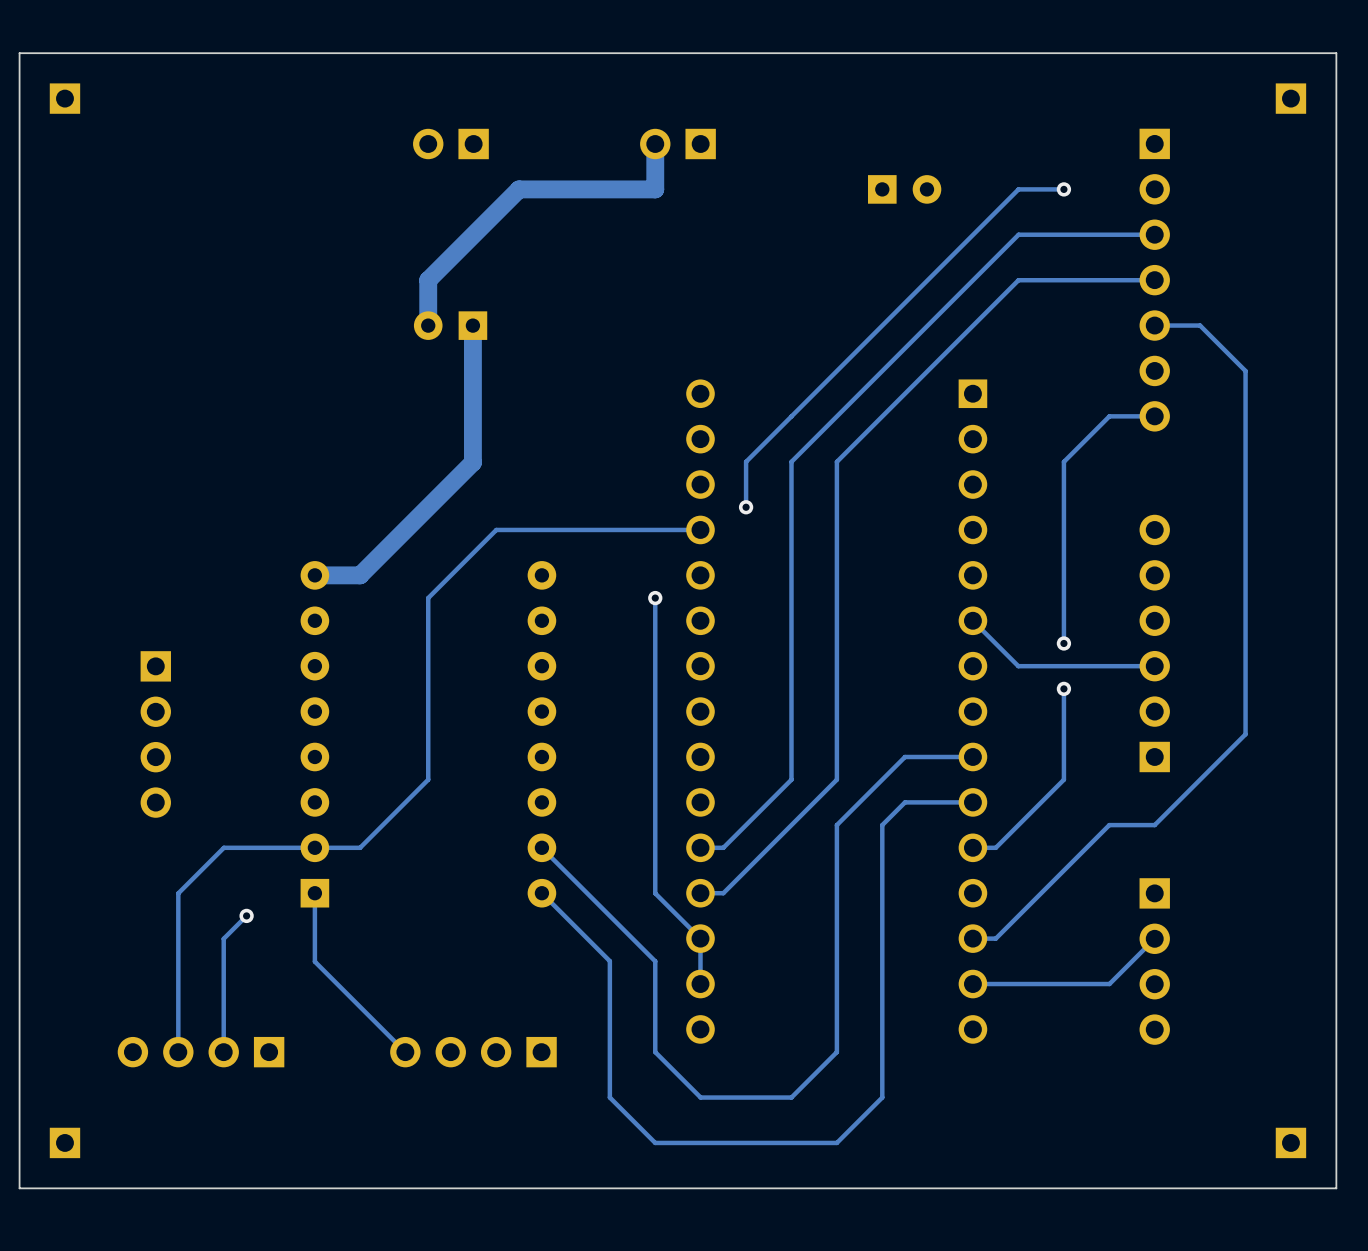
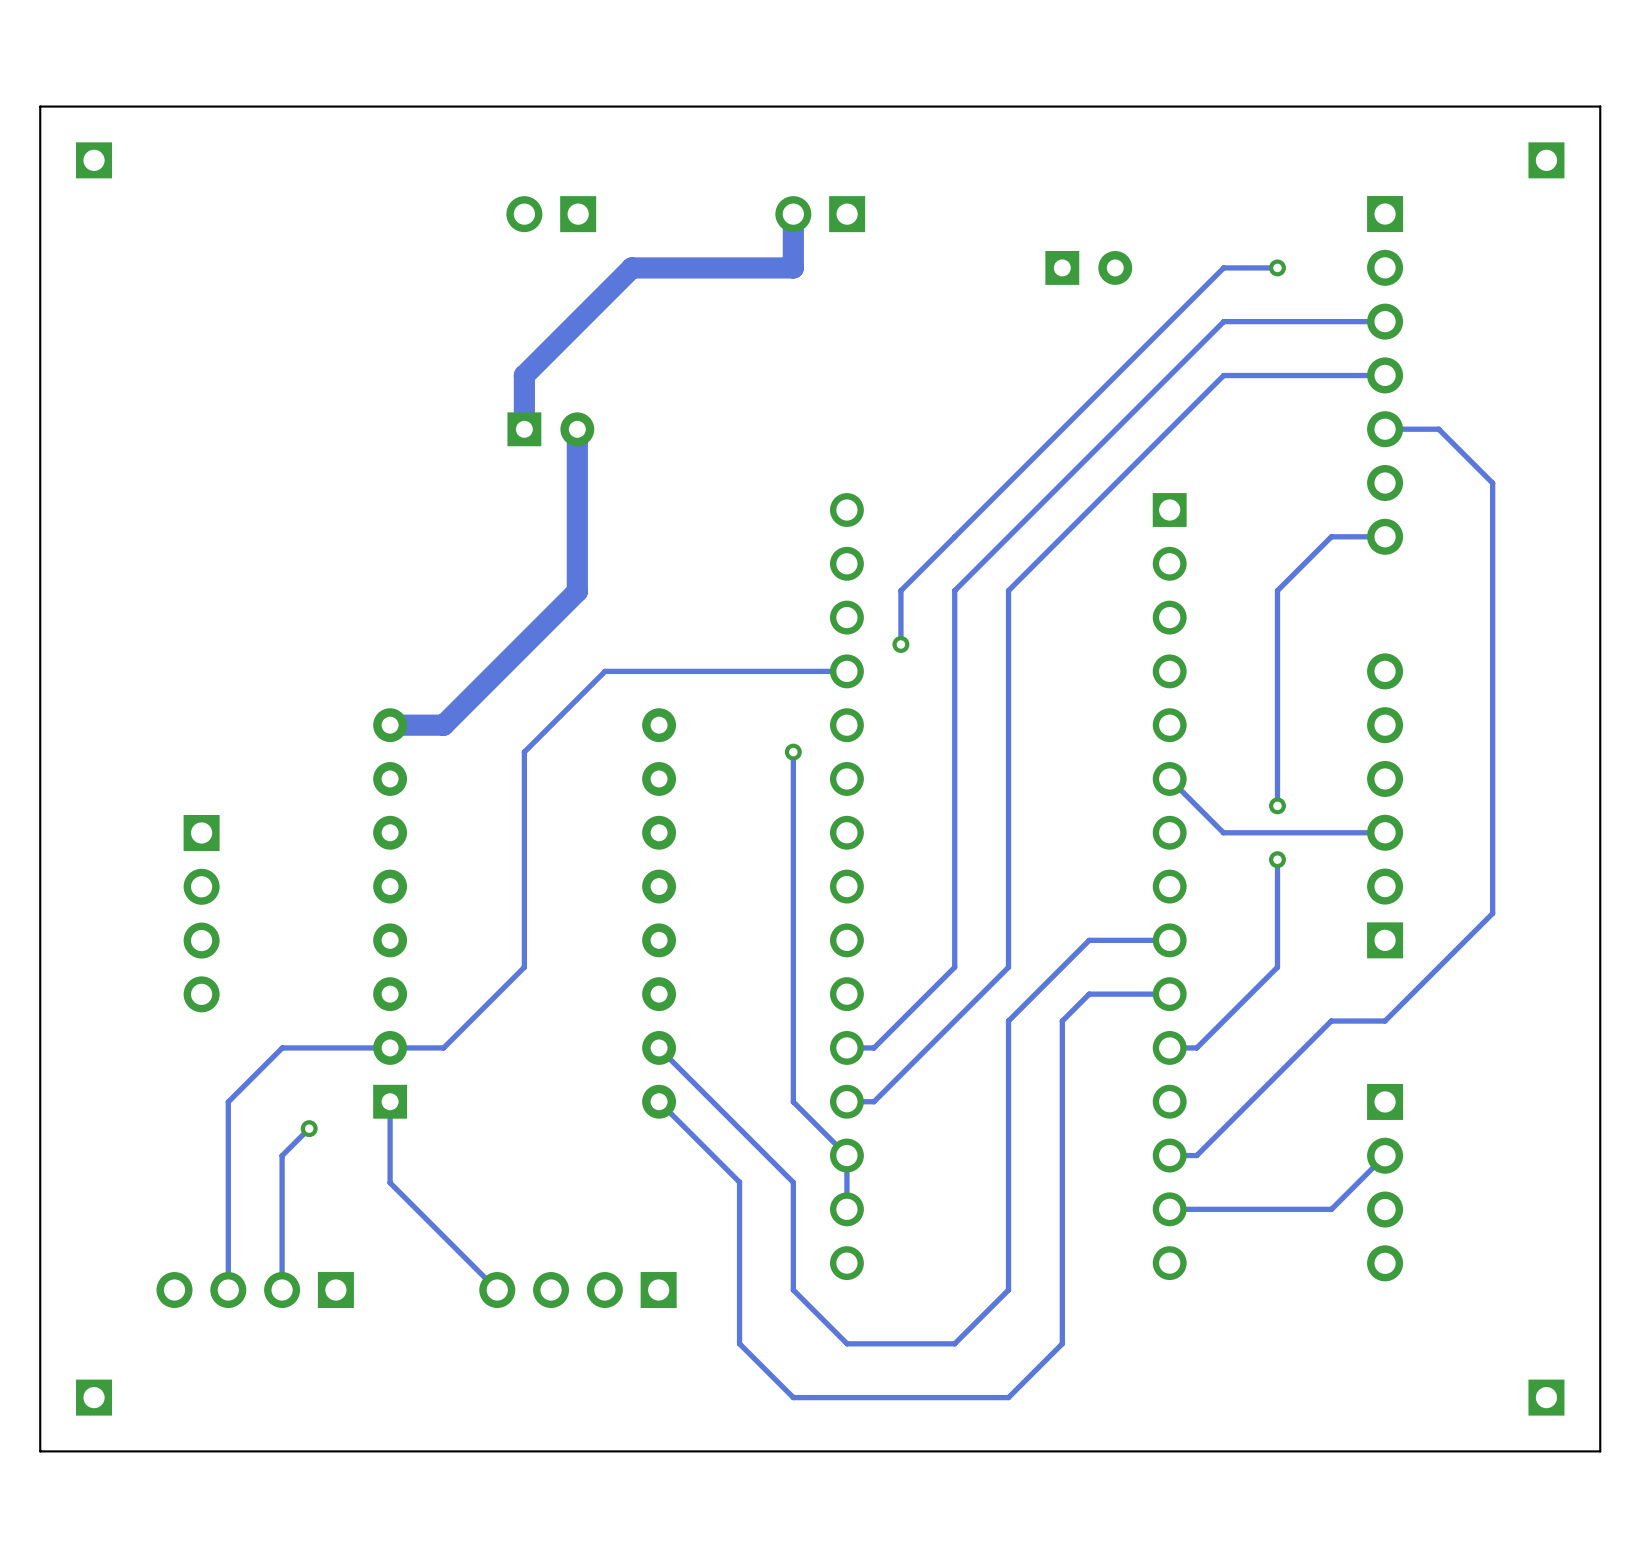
part rotation: 0° (450, 325) -> 180° (550, 429)

